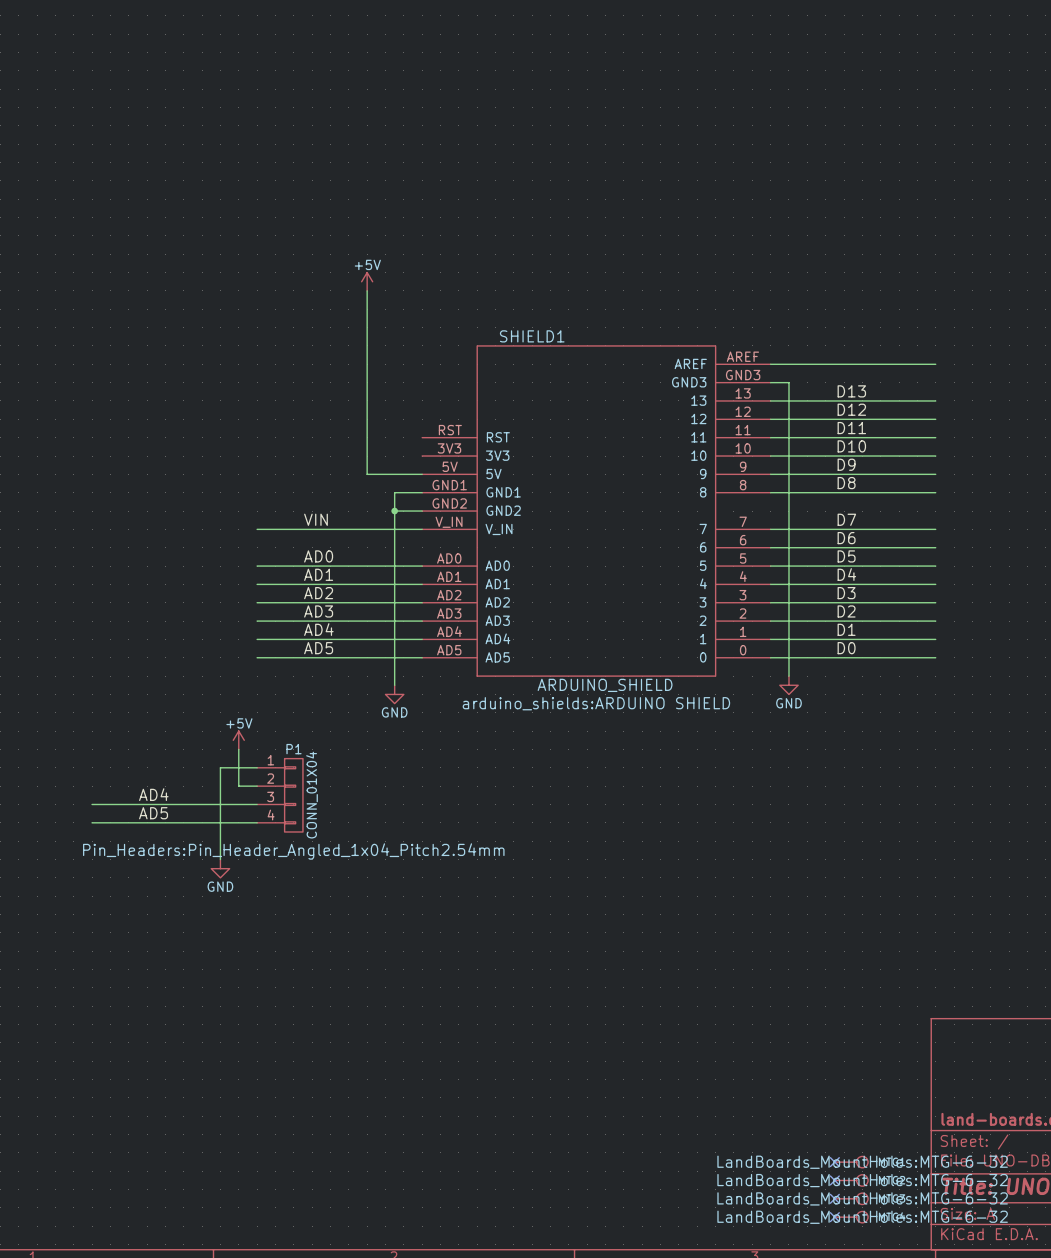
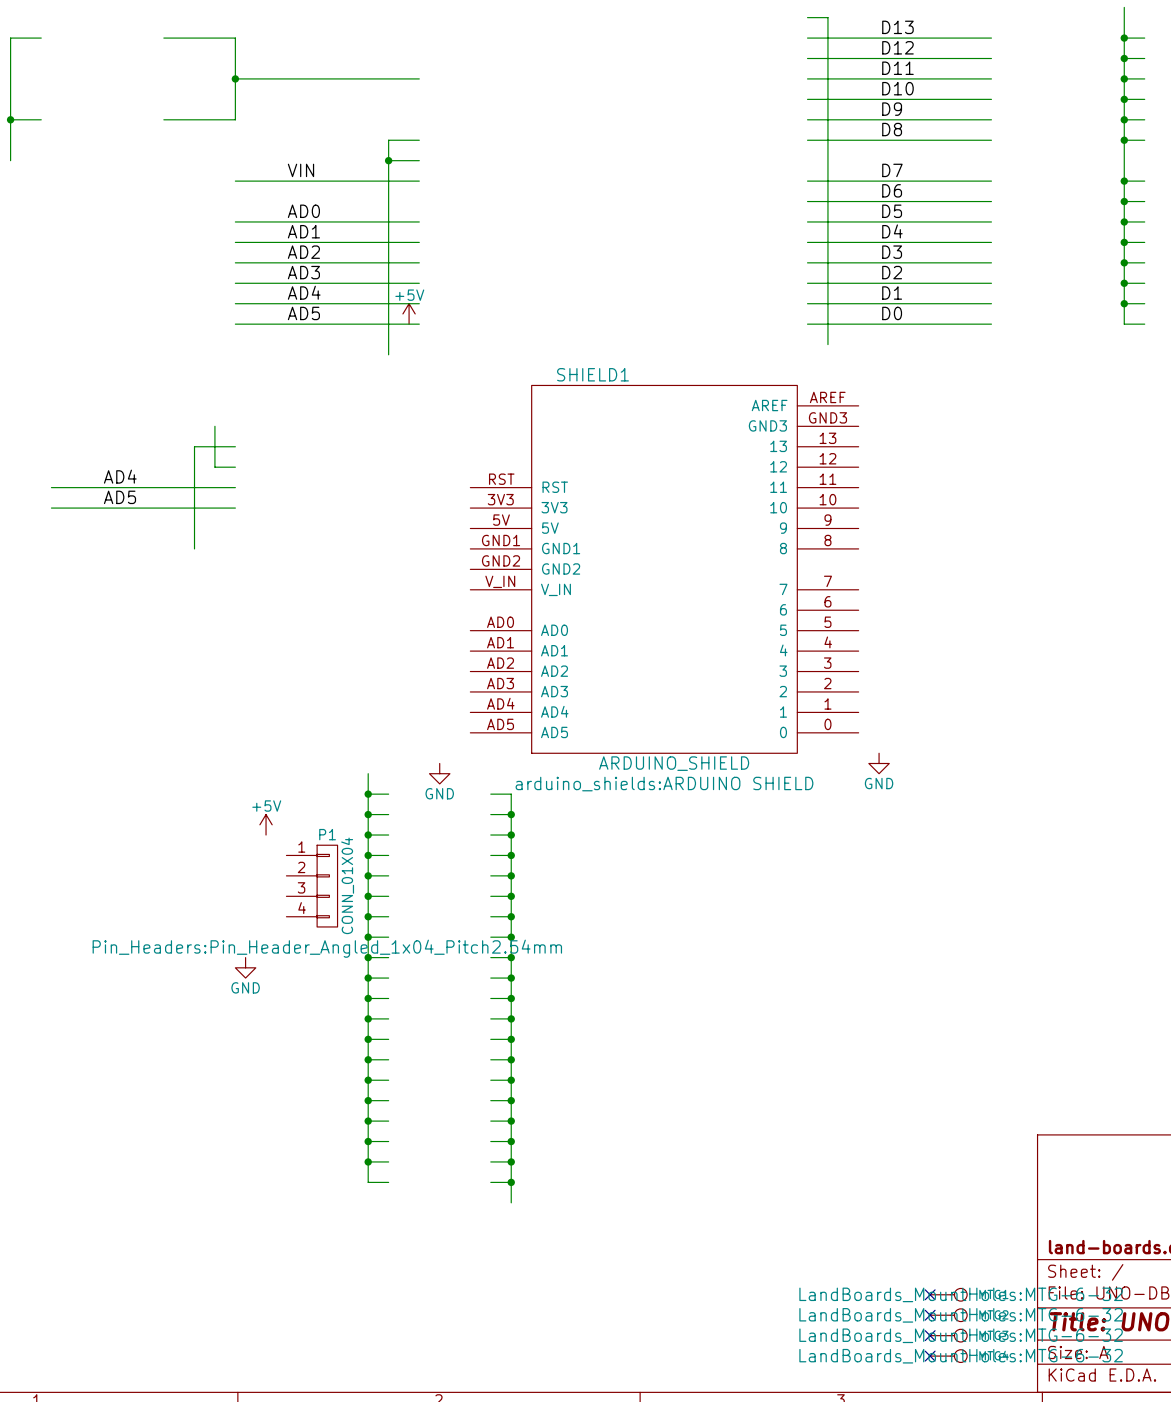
wire: none -> (1124, 7) (1124, 324) (1144, 324)
wire: none -> (807, 17) (827, 17) (827, 344)
label: none -> D13 (897, 27)
wire: none -> (41, 38) (10, 38) (10, 160)
wire: none -> (163, 38) (235, 38) (235, 119) (163, 119)
wire: none -> (807, 38) (991, 38)
wire: none -> (1124, 38) (1144, 38)
junction: none -> (1124, 38)
label: none -> D12 (897, 47)
wire: none -> (807, 58) (991, 58)
wire: none -> (1124, 58) (1144, 58)
junction: none -> (1124, 58)
label: none -> D11 (897, 68)
wire: none -> (235, 78) (419, 78)
junction: none -> (235, 78)
wire: none -> (807, 78) (991, 78)
wire: none -> (1124, 78) (1144, 78)
junction: none -> (1124, 78)
label: none -> D10 (897, 88)
wire: none -> (807, 99) (991, 99)
wire: none -> (1124, 99) (1144, 99)
junction: none -> (1124, 99)
label: none -> D9 (892, 109)
wire: none -> (10, 119) (41, 119)
junction: none -> (10, 119)
wire: none -> (807, 119) (991, 119)
wire: none -> (1124, 119) (1144, 119)
junction: none -> (1124, 119)
label: none -> D8 (892, 129)
wire: none -> (419, 140) (388, 140) (388, 354)
wire: none -> (807, 140) (991, 140)
wire: none -> (1124, 140) (1144, 140)
junction: none -> (1124, 140)
wire: none -> (388, 160) (419, 160)
junction: none -> (388, 160)
label: none -> VIN (300, 170)
label: none -> D7 (892, 170)
wire: none -> (235, 181) (419, 181)
wire: none -> (807, 181) (991, 181)
wire: none -> (1124, 181) (1144, 181)
junction: none -> (1124, 181)
label: none -> D6 (892, 190)
wire: none -> (807, 201) (991, 201)
wire: none -> (1124, 201) (1144, 201)
junction: none -> (1124, 201)
label: none -> AD0 (303, 211)
label: none -> D5 (892, 211)
wire: none -> (235, 221) (419, 221)
wire: none -> (1124, 221) (1144, 221)
junction: none -> (1124, 221)
label: none -> AD1 (303, 231)
label: none -> D4 (892, 231)
wire: none -> (235, 242) (419, 242)
wire: none -> (807, 242) (991, 242)
wire: none -> (1124, 242) (1144, 242)
junction: none -> (1124, 242)
label: none -> AD2 (303, 252)
label: none -> D3 (892, 252)
wire: none -> (235, 262) (419, 262)
wire: none -> (1124, 262) (1144, 262)
junction: none -> (1124, 262)
label: none -> AD3 (303, 272)
label: none -> D2 (892, 272)
wire: none -> (235, 283) (419, 283)
wire: none -> (1124, 283) (1144, 283)
junction: none -> (1124, 283)
label: none -> AD4 (304, 292)
label: none -> D1 (892, 293)
wire: none -> (235, 303) (419, 303)
wire: none -> (1124, 303) (1144, 303)
junction: none -> (1124, 303)
label: none -> AD5 (303, 313)
label: none -> D0 (892, 313)
wire: none -> (235, 324) (419, 324)
wire: (367, 290) (367, 474) (422, 474) -> none
wire: (770, 364) (935, 364) -> (807, 221) (991, 221)
wire: none -> (214, 426) (214, 467) (235, 467)
wire: (770, 382) (788, 382) (788, 676) -> none
label: D13 (851, 391) -> none
wire: none -> (235, 446) (194, 446) (194, 548)
wire: (770, 400) (935, 400) -> (807, 262) (991, 262)
label: D12 (851, 409) -> none
wire: (770, 419) (935, 419) -> (807, 283) (991, 283)
label: none -> AD4 (120, 476)
label: D11 (851, 428) -> none
wire: none -> (51, 487) (235, 487)
wire: (770, 437) (935, 437) -> (807, 303) (991, 303)
label: none -> AD5 (119, 497)
label: D10 (851, 446) -> none
wire: none -> (51, 508) (235, 508)
wire: (770, 456) (935, 456) -> (807, 324) (991, 324)
label: D9 (846, 464) -> none
wire: (770, 474) (935, 474) -> none
label: D8 (846, 483) -> none
wire: (422, 492) (394, 492) (394, 685) -> none
wire: (770, 492) (935, 492) -> none
wire: (394, 511) (422, 511) -> none
junction: (394, 511) -> none
label: VIN (316, 519) -> none
label: D7 (846, 519) -> none
wire: (257, 529) (422, 529) -> none
wire: (770, 529) (935, 529) -> none
label: D6 (846, 538) -> none
wire: (770, 547) (935, 547) -> none
label: AD0 (318, 556) -> none
label: D5 (846, 556) -> none
wire: (257, 566) (422, 566) -> none
wire: (770, 566) (935, 566) -> none
label: AD1 (318, 574) -> none
label: D4 (846, 574) -> none
wire: (257, 584) (422, 584) -> none
wire: (770, 584) (935, 584) -> none
label: AD2 (318, 593) -> none
label: D3 (846, 593) -> none
wire: (257, 602) (422, 602) -> none
wire: (770, 602) (935, 602) -> none
label: AD3 (318, 611) -> none
label: D2 (846, 611) -> none
wire: (257, 621) (422, 621) -> none
wire: (770, 621) (935, 621) -> none
label: AD4 (318, 629) -> none
label: D1 (846, 629) -> none
wire: (257, 639) (422, 639) -> none
wire: (770, 639) (935, 639) -> none
label: AD5 (318, 648) -> none
label: D0 (846, 648) -> none
wire: (257, 657) (422, 657) -> none
wire: (770, 657) (935, 657) -> none
wire: none -> (368, 773) (368, 1182) (388, 1182)
wire: none -> (368, 794) (388, 794)
junction: none -> (368, 794)
wire: none -> (490, 794) (511, 794) (511, 1202)
wire: none -> (368, 814) (388, 814)
junction: none -> (368, 814)
wire: none -> (490, 814) (511, 814)
junction: none -> (511, 814)
wire: (238, 749) (238, 786) (257, 786) -> none
wire: none -> (368, 835) (388, 835)
junction: none -> (368, 835)
wire: none -> (490, 835) (511, 835)
junction: none -> (511, 835)
wire: (257, 767) (220, 767) (220, 859) -> none
wire: none -> (368, 855) (388, 855)
junction: none -> (368, 855)
wire: none -> (490, 855) (511, 855)
junction: none -> (511, 855)
wire: none -> (368, 875) (388, 875)
junction: none -> (368, 875)
wire: none -> (490, 875) (511, 875)
junction: none -> (511, 875)
label: AD4 (153, 794) -> none
wire: (92, 804) (257, 804) -> none
wire: none -> (368, 896) (388, 896)
junction: none -> (368, 896)
wire: none -> (490, 896) (511, 896)
junction: none -> (511, 896)
label: AD5 (153, 813) -> none
wire: (92, 822) (257, 822) -> none
wire: none -> (368, 916) (388, 916)
junction: none -> (368, 916)
wire: none -> (490, 916) (511, 916)
junction: none -> (511, 916)
wire: none -> (368, 937) (388, 937)
junction: none -> (368, 937)
wire: none -> (490, 937) (511, 937)
junction: none -> (511, 937)
wire: none -> (368, 957) (388, 957)
junction: none -> (368, 957)
wire: none -> (490, 957) (511, 957)
junction: none -> (511, 957)
wire: none -> (368, 978) (388, 978)
junction: none -> (368, 978)
wire: none -> (490, 978) (511, 978)
junction: none -> (511, 978)
wire: none -> (368, 998) (388, 998)
junction: none -> (368, 998)
wire: none -> (490, 998) (511, 998)
junction: none -> (511, 998)
wire: none -> (368, 1018) (388, 1018)
junction: none -> (368, 1018)
wire: none -> (490, 1018) (511, 1018)
junction: none -> (511, 1018)
wire: none -> (368, 1039) (388, 1039)
junction: none -> (368, 1039)
wire: none -> (490, 1039) (511, 1039)
junction: none -> (511, 1039)
wire: none -> (368, 1059) (388, 1059)
junction: none -> (368, 1059)
wire: none -> (490, 1059) (511, 1059)
junction: none -> (511, 1059)
wire: none -> (368, 1080) (388, 1080)
junction: none -> (368, 1080)
wire: none -> (490, 1080) (511, 1080)
junction: none -> (511, 1080)
wire: none -> (368, 1100) (388, 1100)
junction: none -> (368, 1100)
wire: none -> (490, 1100) (511, 1100)
junction: none -> (511, 1100)
wire: none -> (368, 1121) (388, 1121)
junction: none -> (368, 1121)
wire: none -> (490, 1121) (511, 1121)
junction: none -> (511, 1121)
wire: none -> (368, 1141) (388, 1141)
junction: none -> (368, 1141)
wire: none -> (490, 1141) (511, 1141)
junction: none -> (511, 1141)
wire: none -> (368, 1161) (388, 1161)
junction: none -> (368, 1161)
wire: none -> (490, 1161) (511, 1161)
junction: none -> (511, 1161)
wire: none -> (490, 1182) (511, 1182)
junction: none -> (511, 1182)

